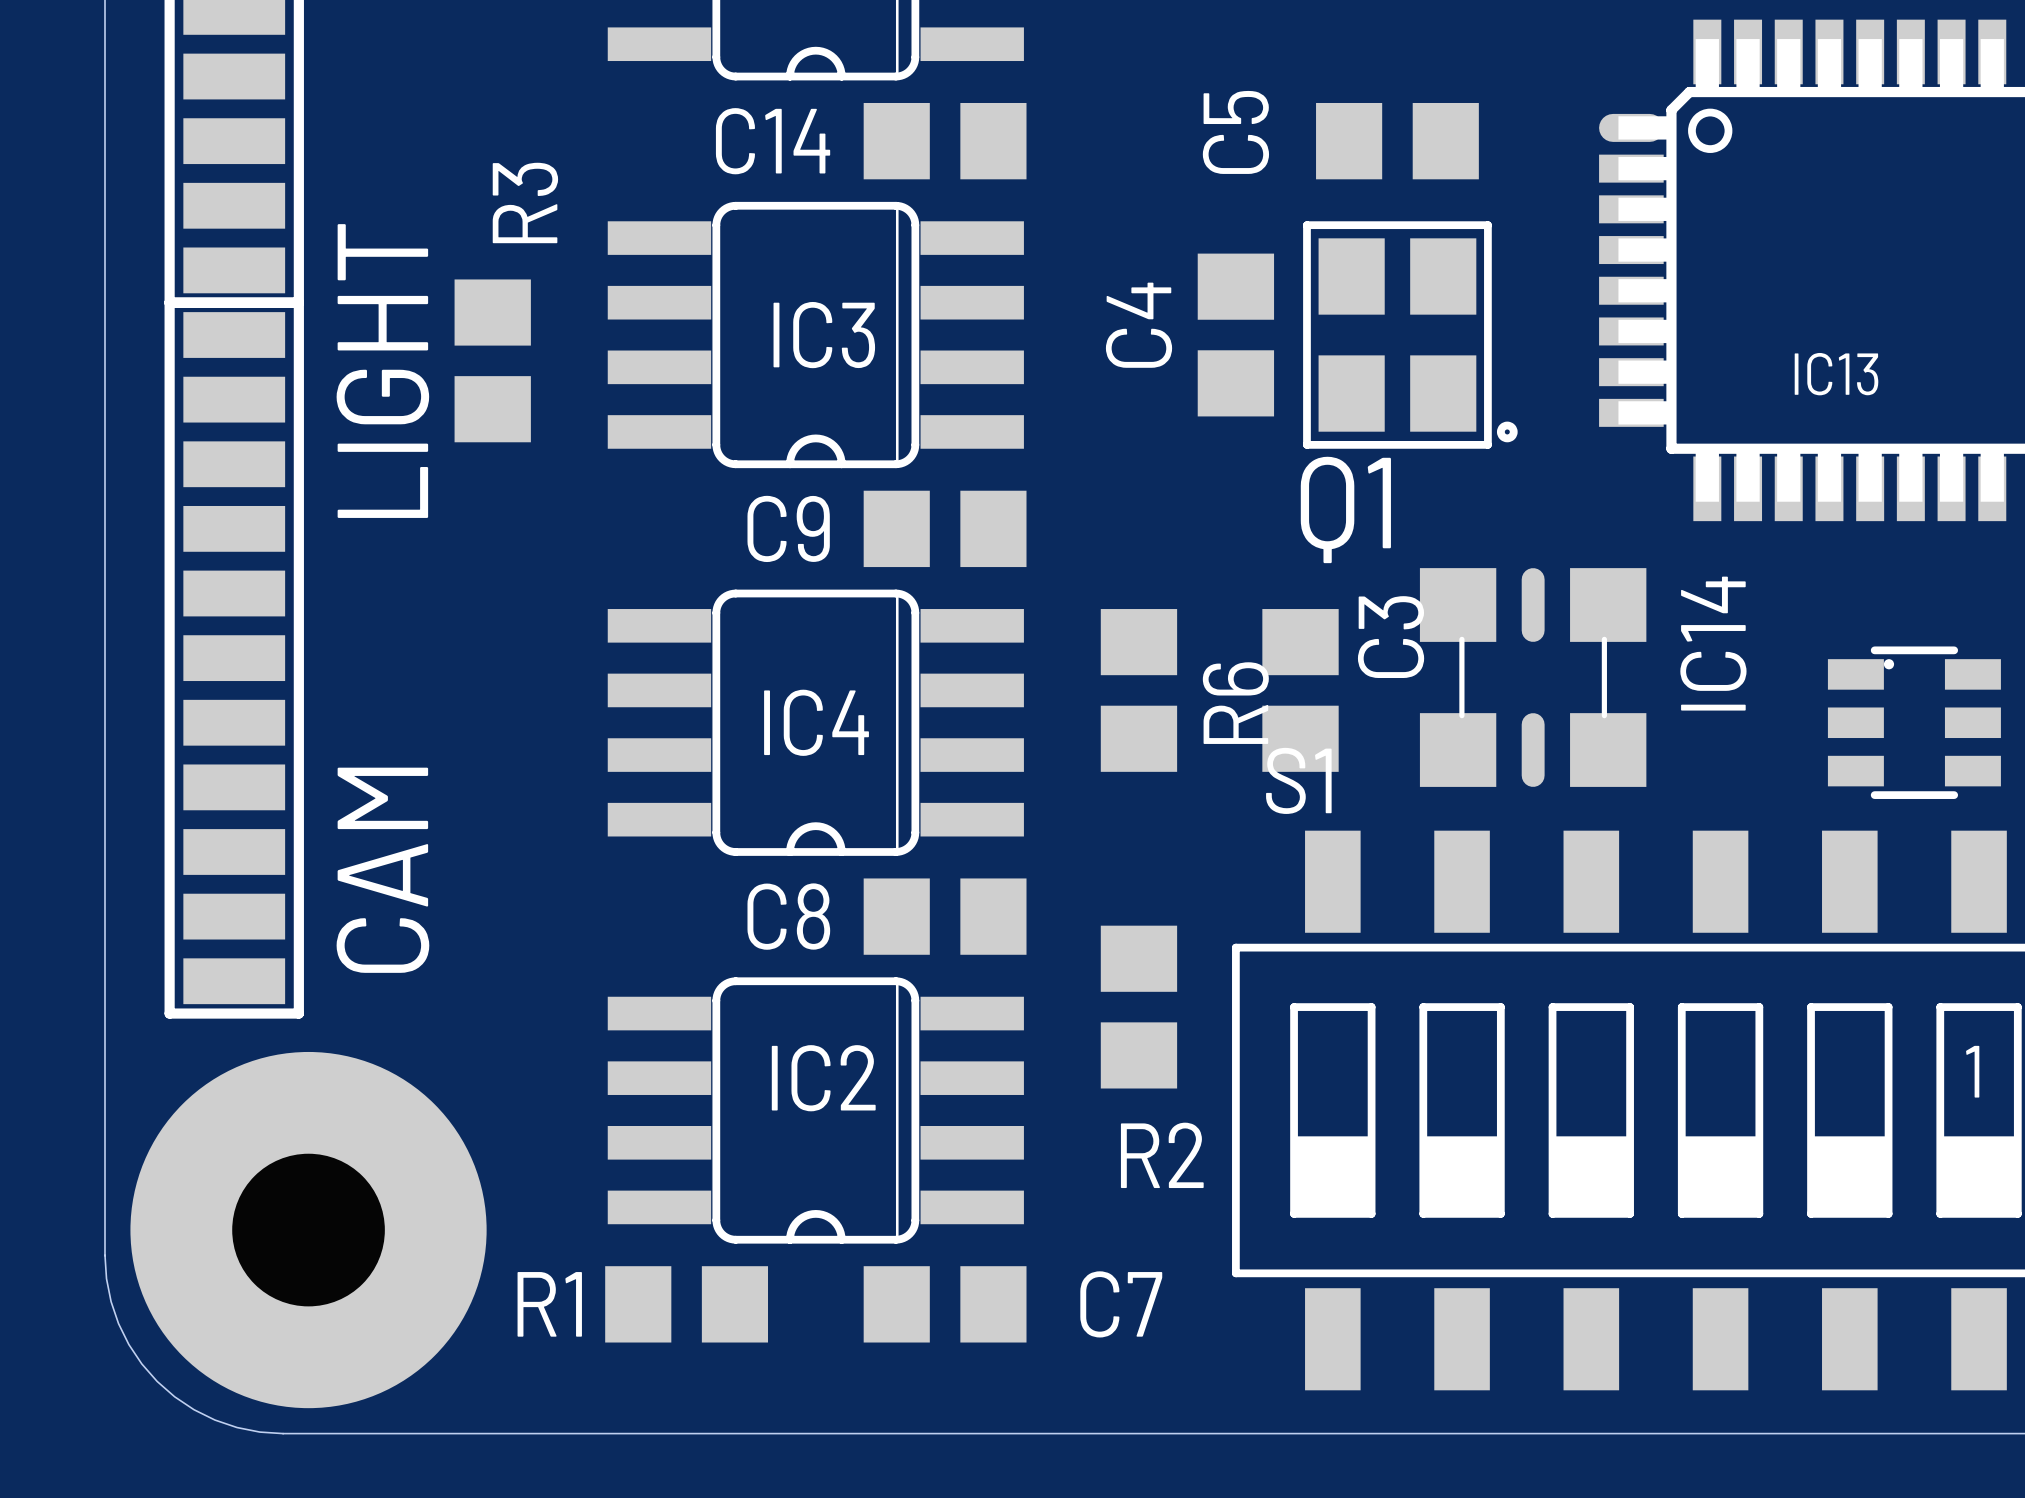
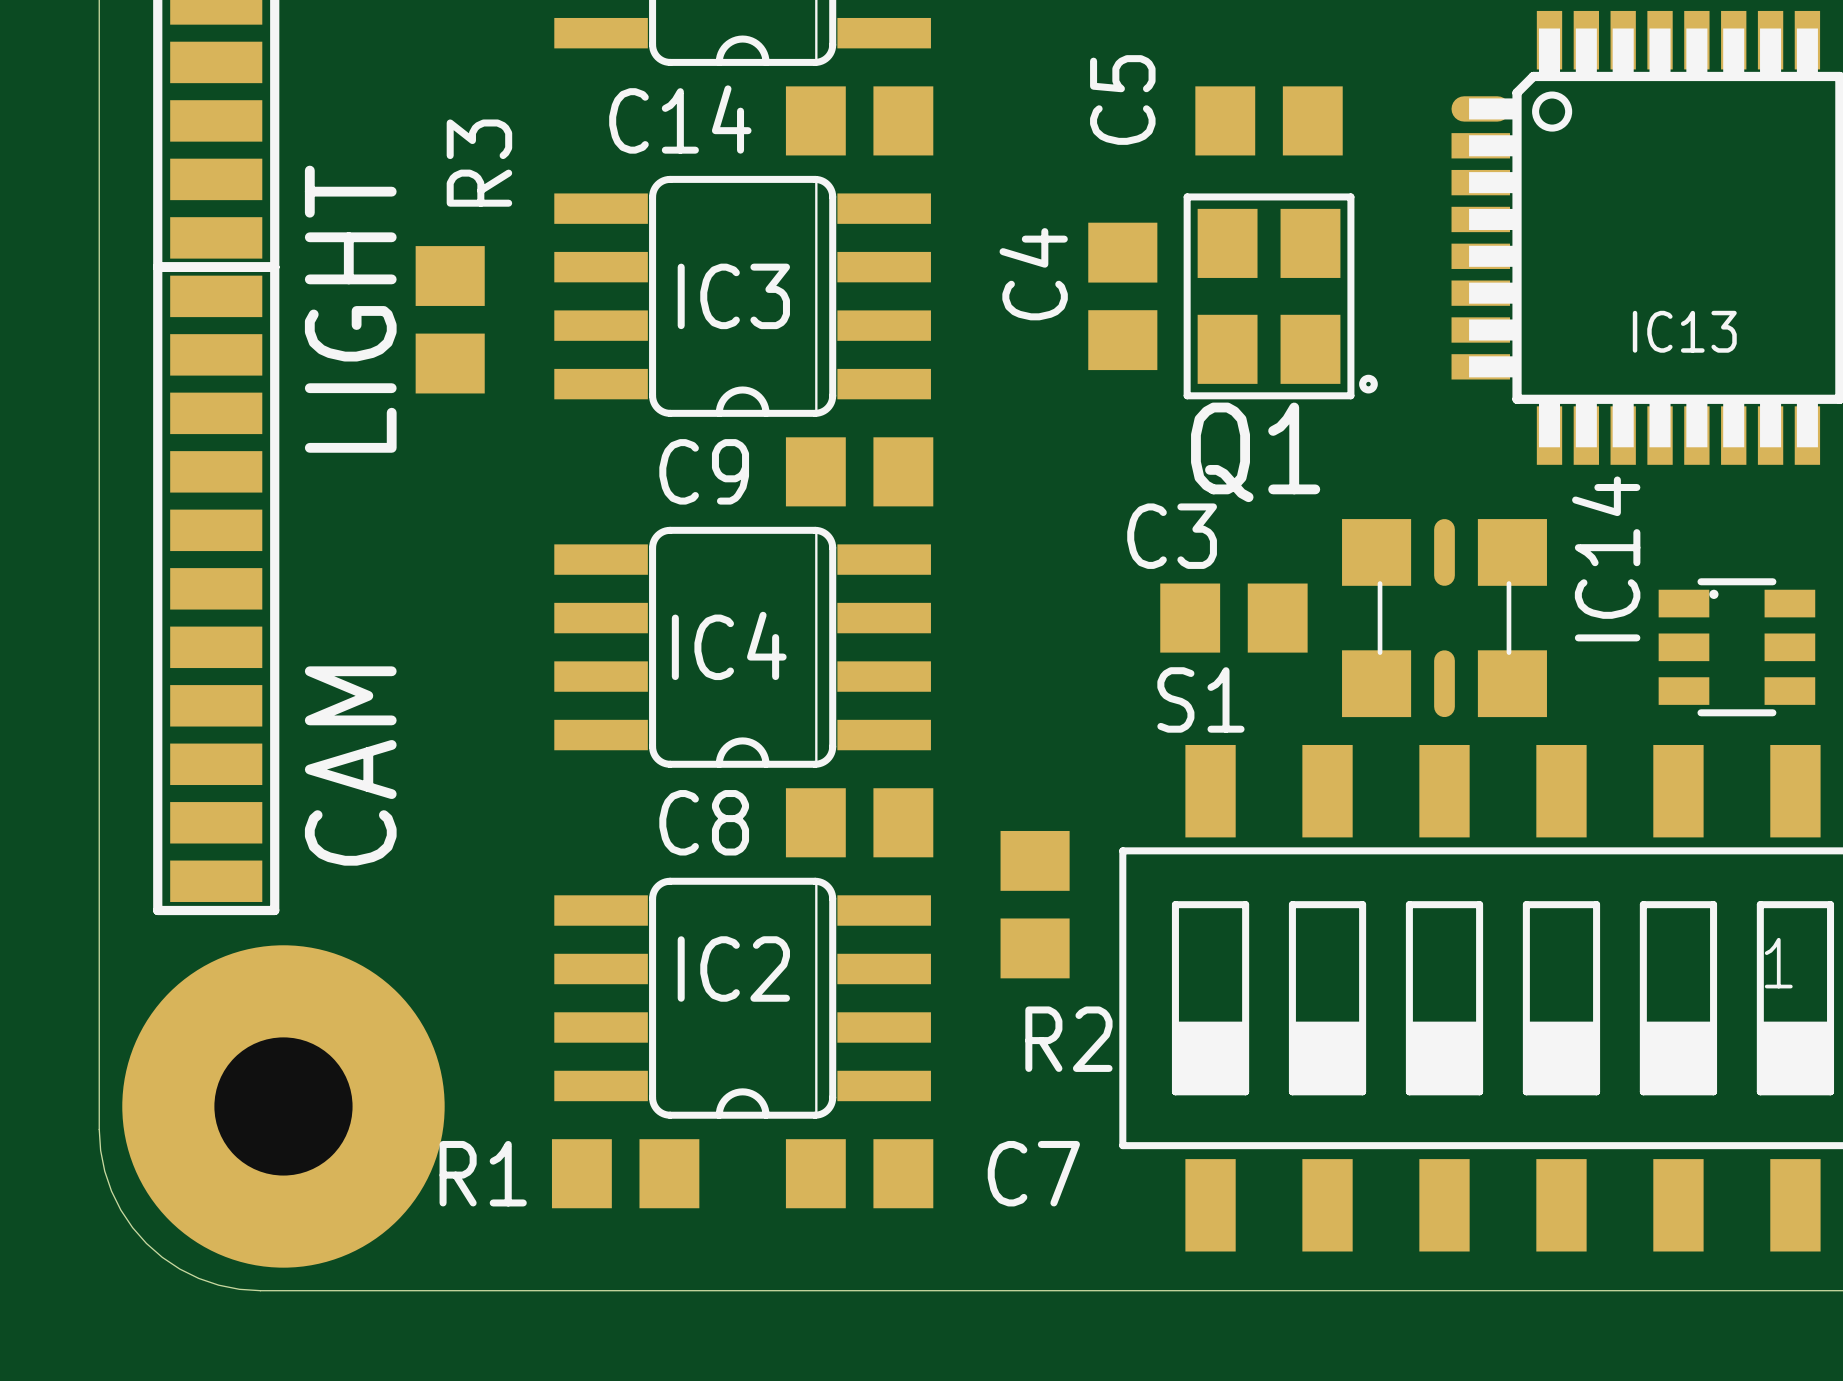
C3 name position: C3 (1391, 637) -> C3 (1172, 536)
IC14 position: (1533, 677) -> (1444, 618)
R6: (1138, 690) -> none
C3 rotation: 0° (1300, 690) -> 90° clockwise (1233, 618)

